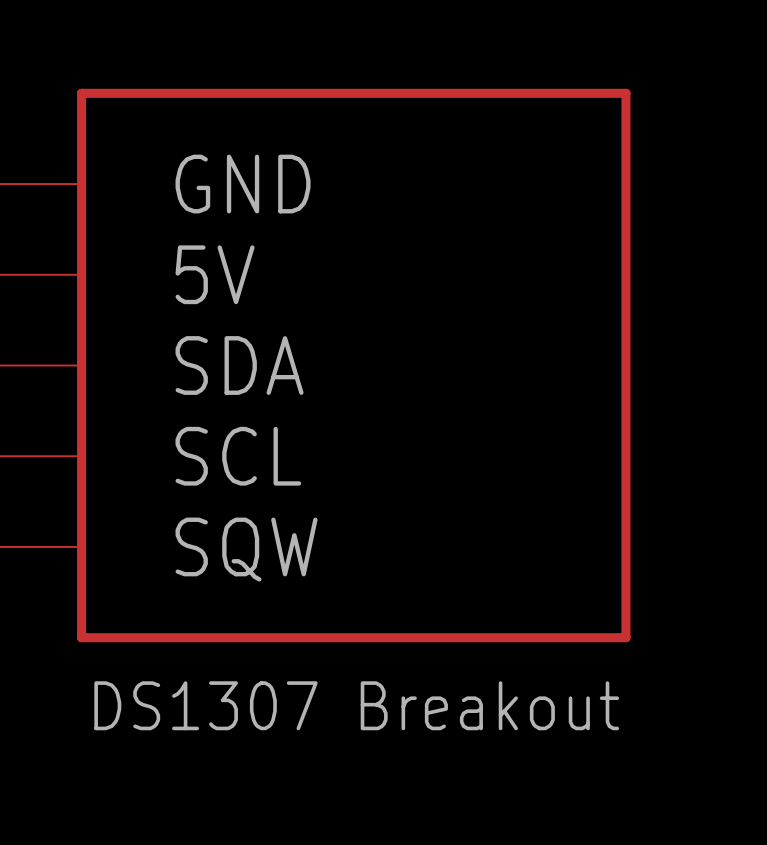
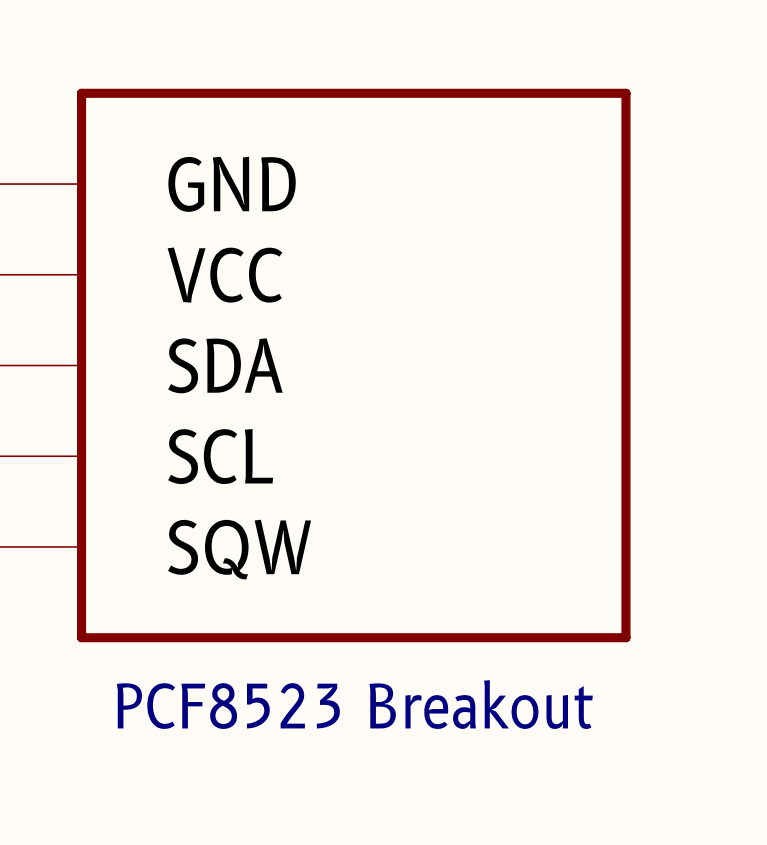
part pin name: 5V (215, 274) -> VCC (224, 275)
part text: DS1307 Breakout (356, 705) -> PCF8523 Breakout (354, 704)

